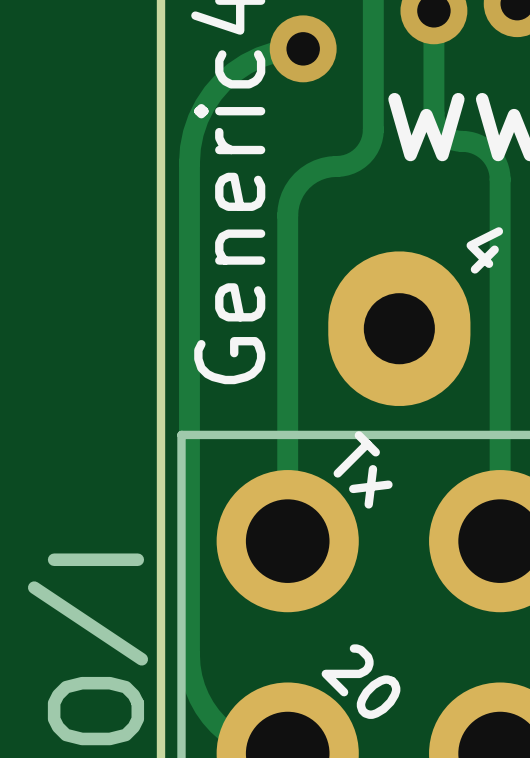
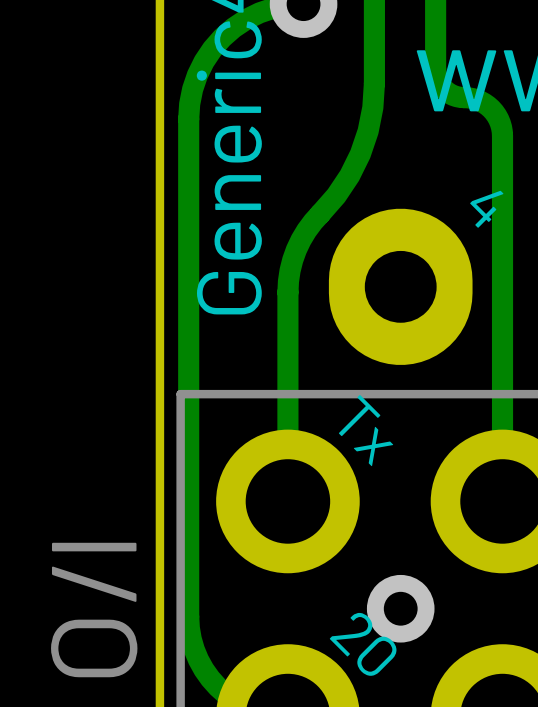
track: (373, 127) (370, 143) (358, 158) (346, 165) (323, 168) (312, 173) (302, 180) (291, 196) (287, 215) (287, 334) -> (374, 83) (372, 107) (368, 131) (360, 153) (349, 175) (336, 195) (313, 221) (301, 239) (292, 260) (287, 292)
via: none -> (400, 608)

